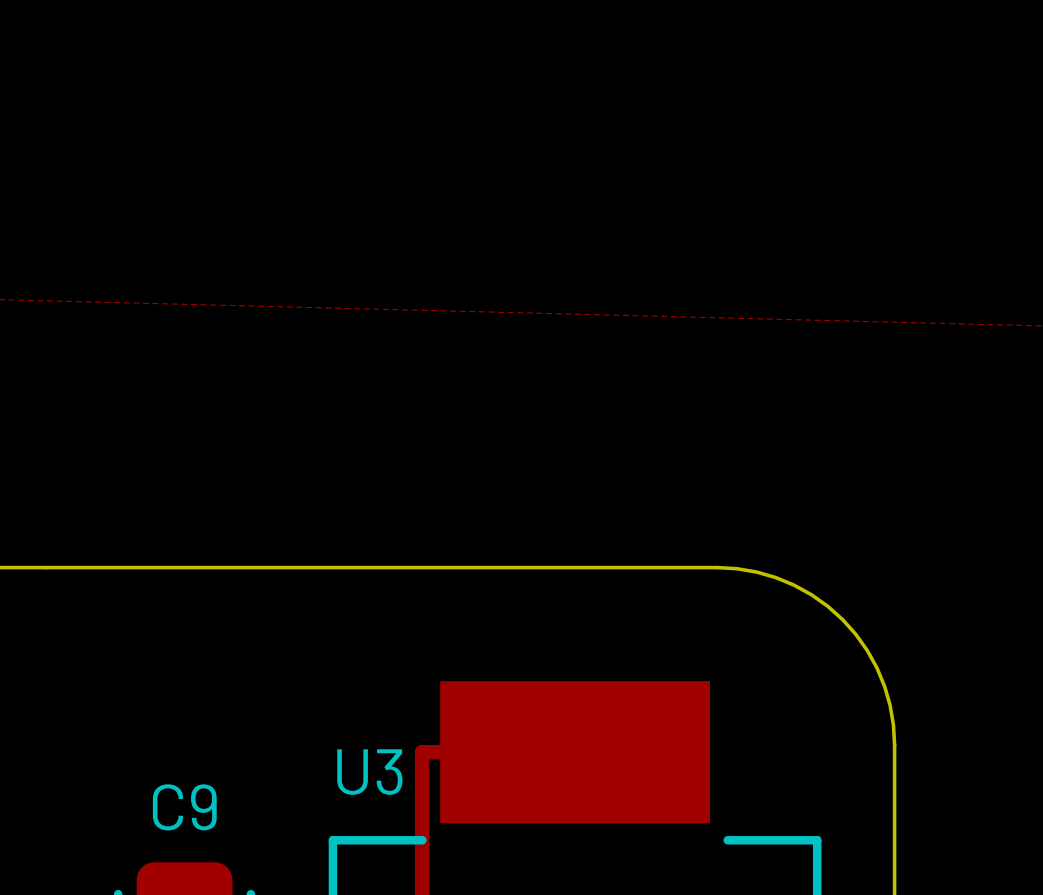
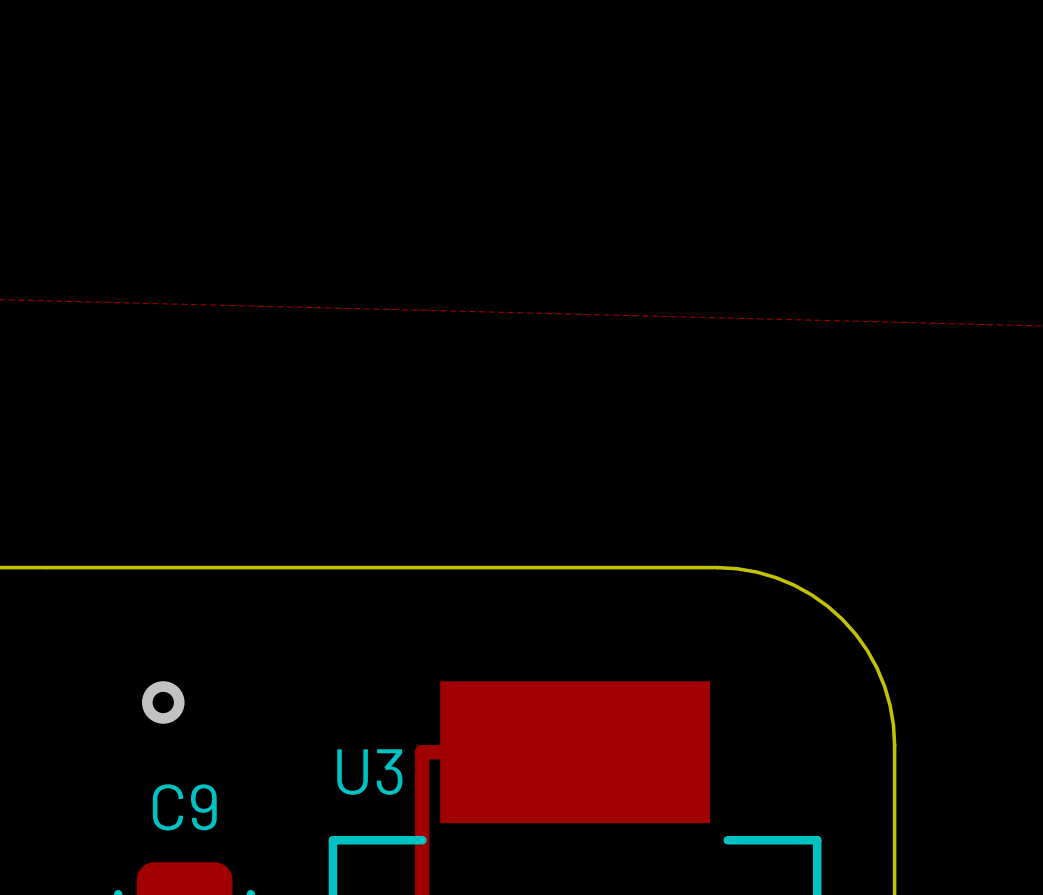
via: none -> (163, 702)

